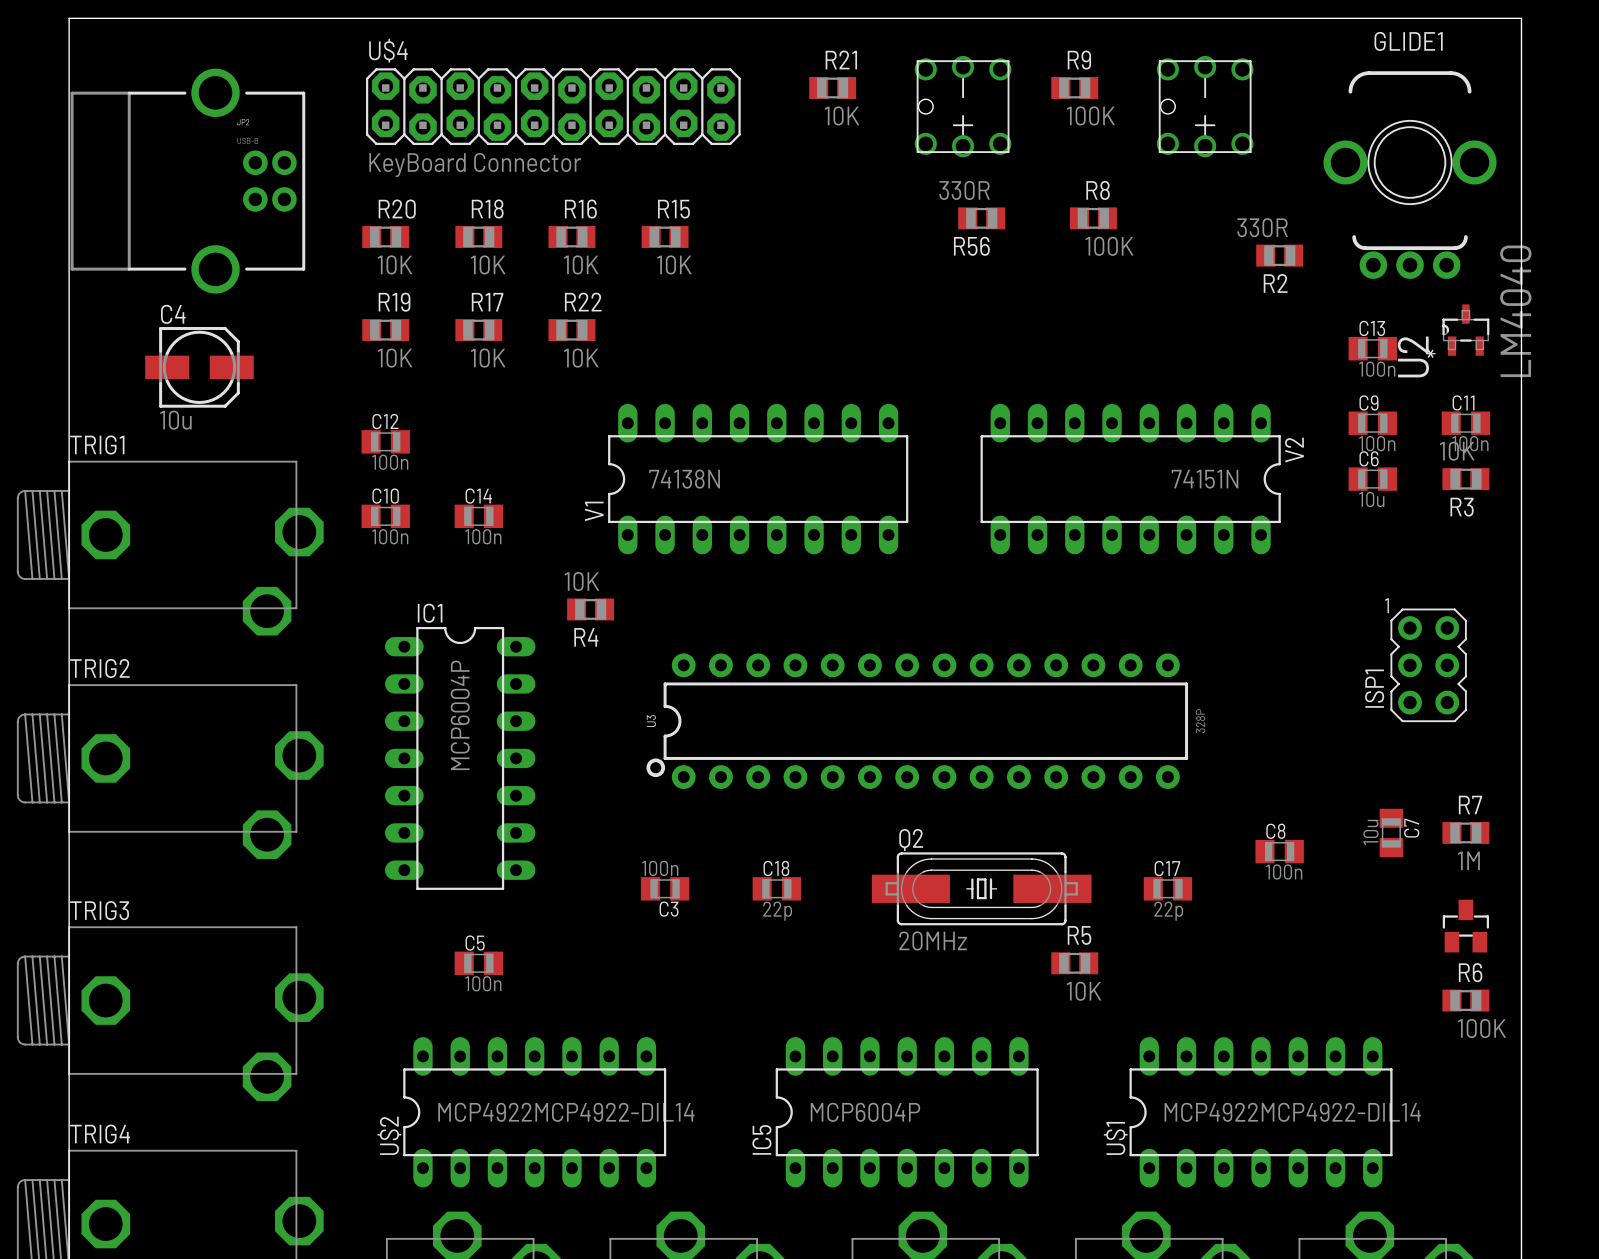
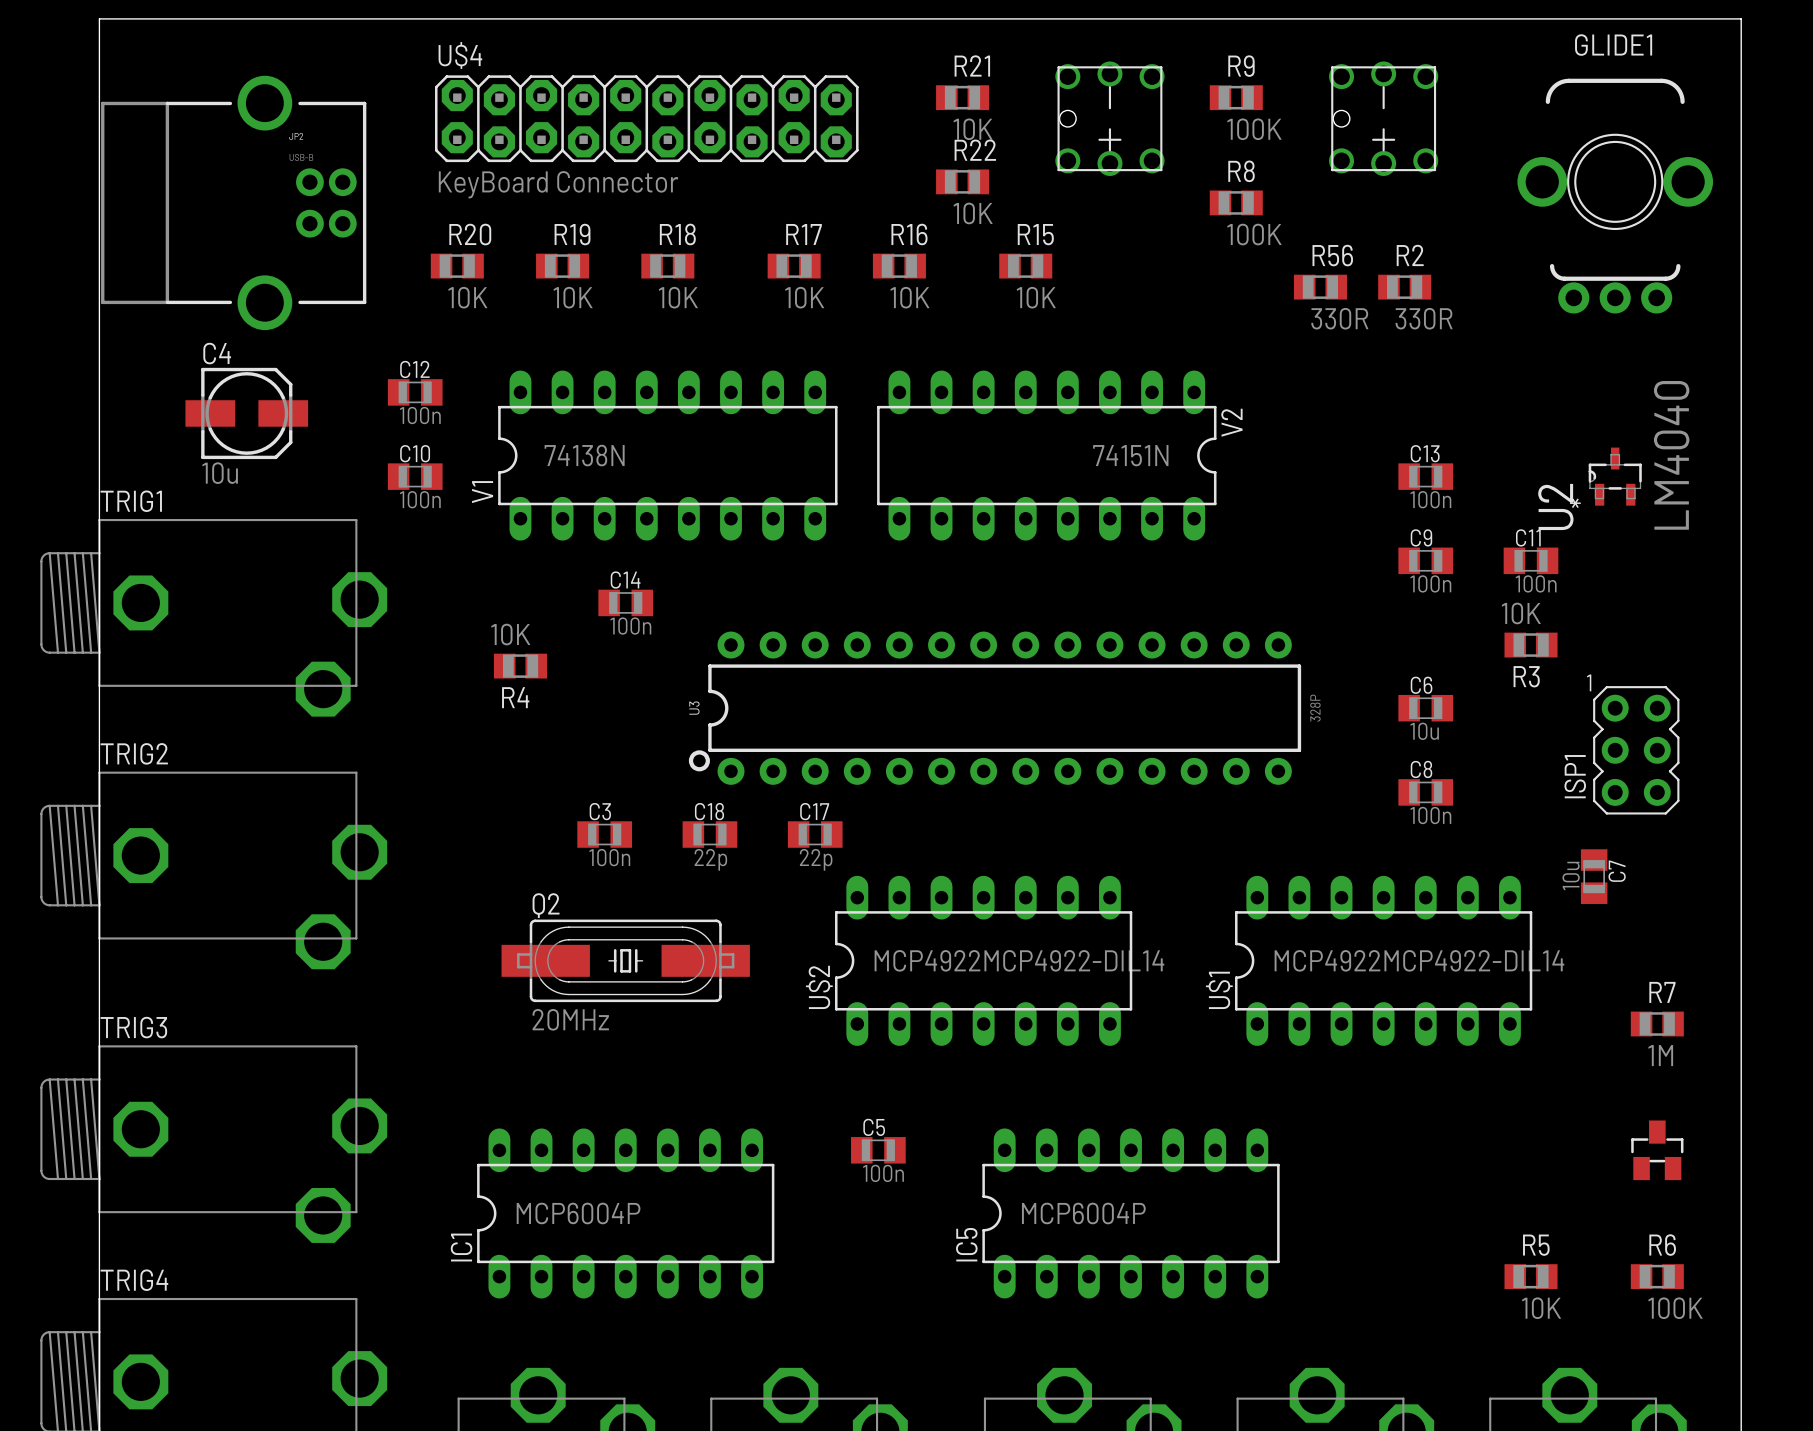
R56 value position: 330R (964, 190) -> 330R (1339, 318)
R18 name: R18 (487, 209) -> R19 (572, 234)
R16 name: R16 (580, 209) -> R18 (677, 234)
R56 position: (981, 218) -> (1320, 287)
R8 position: (1093, 218) -> (1236, 202)
R2 value position: 330R (1262, 227) -> 330R (1424, 318)
R15 position: (665, 236) -> (1025, 266)
R16: none -> 10K (899, 266)
R56 name position: R56 (971, 246) -> R56 (1332, 255)
R2 position: (1279, 255) -> (1404, 287)
R2 name position: R2 (1275, 283) -> R2 (1410, 255)
R19: 10K (385, 330) -> none
R17 position: (478, 330) -> (794, 266)
R22 position: (571, 330) -> (962, 181)
U2 position: (1465, 330) -> (1615, 476)
C13 position: (1372, 348) -> (1425, 476)
C9 position: (1372, 423) -> (1425, 560)
C11 position: (1465, 423) -> (1531, 560)
C12 position: (385, 441) -> (415, 392)
V1 position: (758, 479) -> (667, 455)
V2 position: (1130, 479) -> (1046, 455)
C6 position: (1372, 479) -> (1425, 708)
R3 position: (1465, 479) -> (1531, 645)
C10 position: (385, 516) -> (415, 476)
C14 position: (478, 516) -> (625, 602)
R4 position: (590, 609) -> (520, 666)
U3 position: (917, 721) -> (995, 708)
IC1 rotation: 0° (460, 758) -> 90° counterclockwise (625, 1213)
IC1 position: (460, 758) -> (625, 1213)
C7 position: (1391, 832) -> (1594, 876)
R7 position: (1465, 832) -> (1657, 1023)
C8 position: (1279, 851) -> (1425, 792)
C3 value position: 100n (660, 868) -> 100n (609, 857)
C3 position: (665, 888) -> (604, 834)
C18 position: (776, 888) -> (709, 834)
Q2 position: (981, 888) -> (625, 960)
C17 position: (1167, 888) -> (815, 834)
C3 name position: C3 (669, 909) -> C3 (600, 811)
part position: (1465, 926) -> (1657, 1150)
C5 position: (478, 963) -> (878, 1150)
R5 position: (1074, 963) -> (1531, 1276)
R6 position: (1465, 1000) -> (1657, 1276)
U$2 position: (534, 1112) -> (983, 960)
IC5 position: (907, 1112) -> (1131, 1213)
U$1 position: (1261, 1112) -> (1383, 960)

